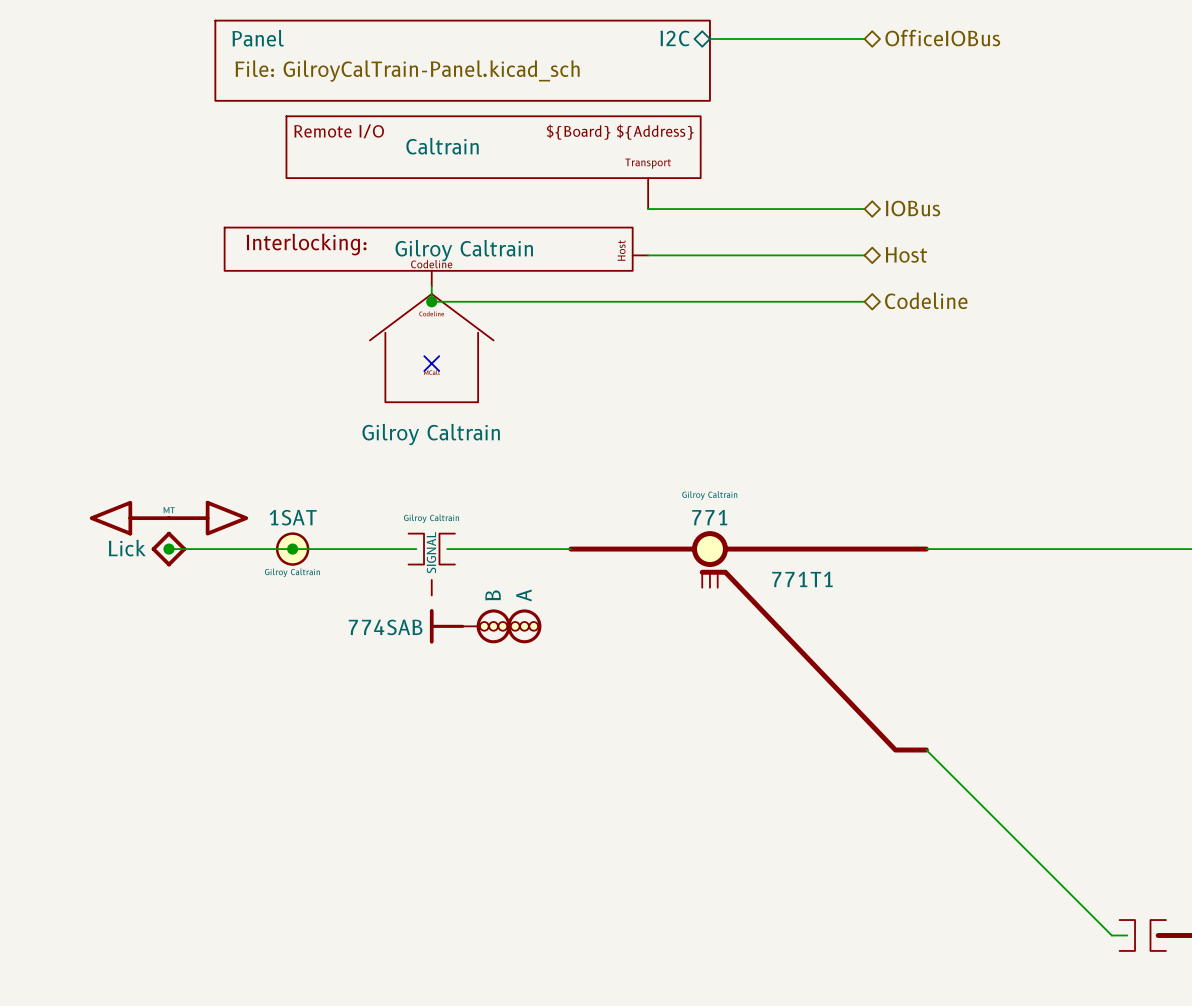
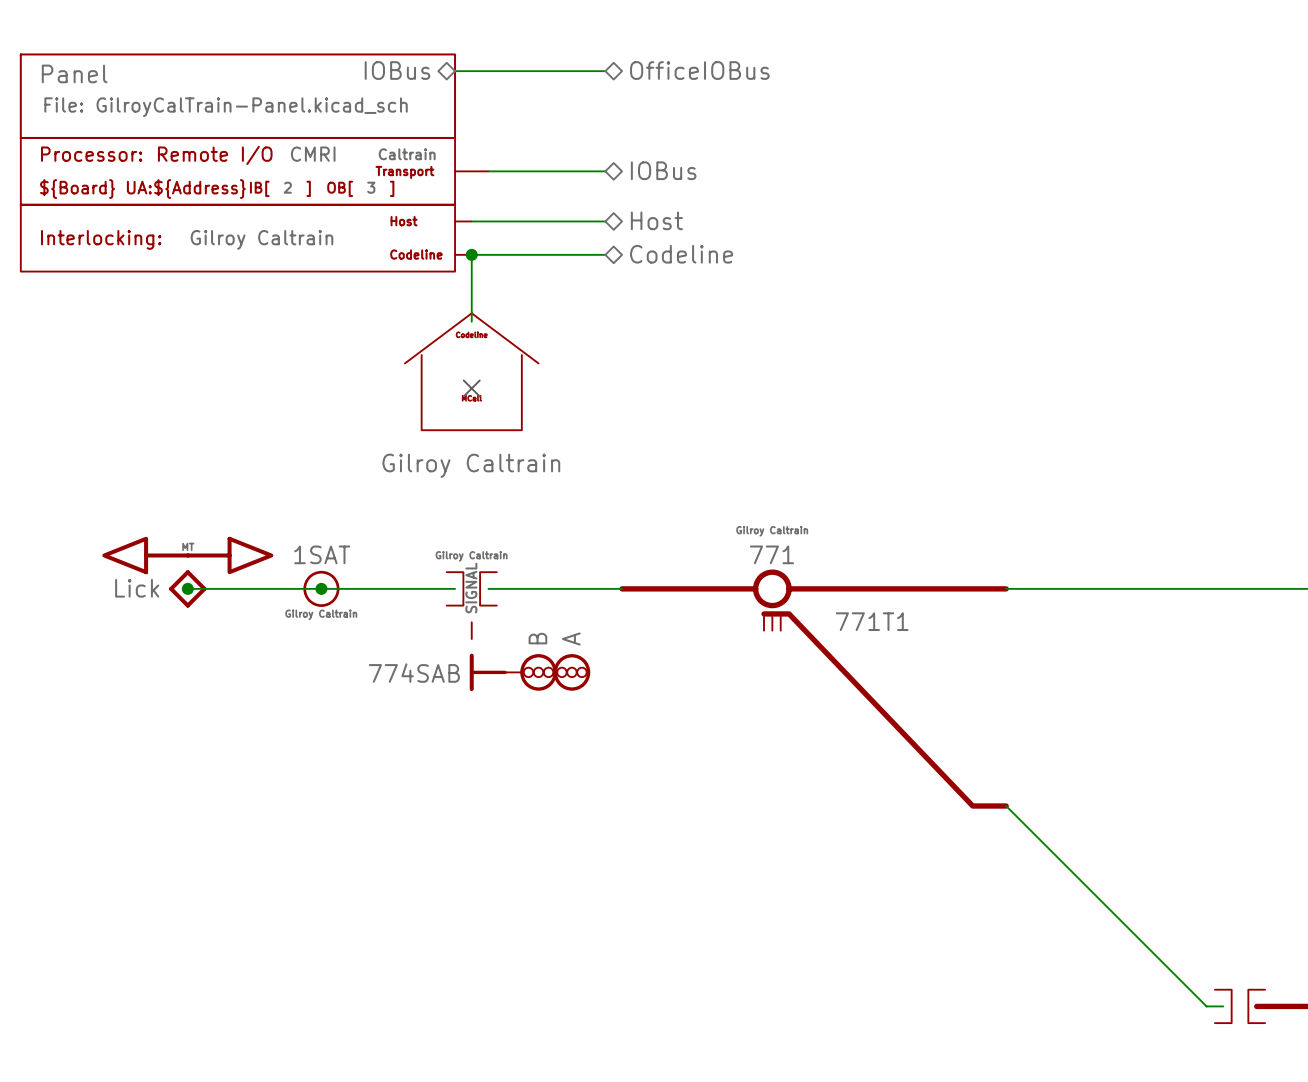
sheet pin: I2C (675, 38) -> none
wire: (709, 38) (864, 38) -> none
hierarchical label: OfficeIOBus (942, 38) -> none
sheet Panel: File: GilroyCalTrain-Panel.kicad_sch (462, 60) -> none
hierarchical label: none -> OfficeIOBus (699, 70)
sheet pin: none -> IOBus (397, 70)
wire: none -> (455, 71) (605, 71)
sheet Panel: none -> File: GilroyCalTrain-Panel.kicad_sch (237, 96)
part: none -> (254, 171)
wire: none -> (488, 171) (605, 171)
part: Caltrain (493, 162) -> none
hierarchical label: none -> IOBus (663, 170)
hierarchical label: none -> Host (656, 220)
hierarchical label: IOBus (912, 208) -> none
wire: none -> (471, 221) (605, 221)
wire: (648, 209) (864, 209) -> none
part: none -> (246, 238)
hierarchical label: none -> Codeline (681, 254)
wire: none -> (605, 254) (471, 254) (471, 304)
hierarchical label: Host (906, 254) -> none
wire: (648, 255) (864, 255) -> none
part: Gilroy Caltrain (436, 256) -> none
hierarchical label: Codeline (926, 300) -> none
wire: (431, 301) (864, 301) -> none
junction position: (431, 301) -> (471, 254)

